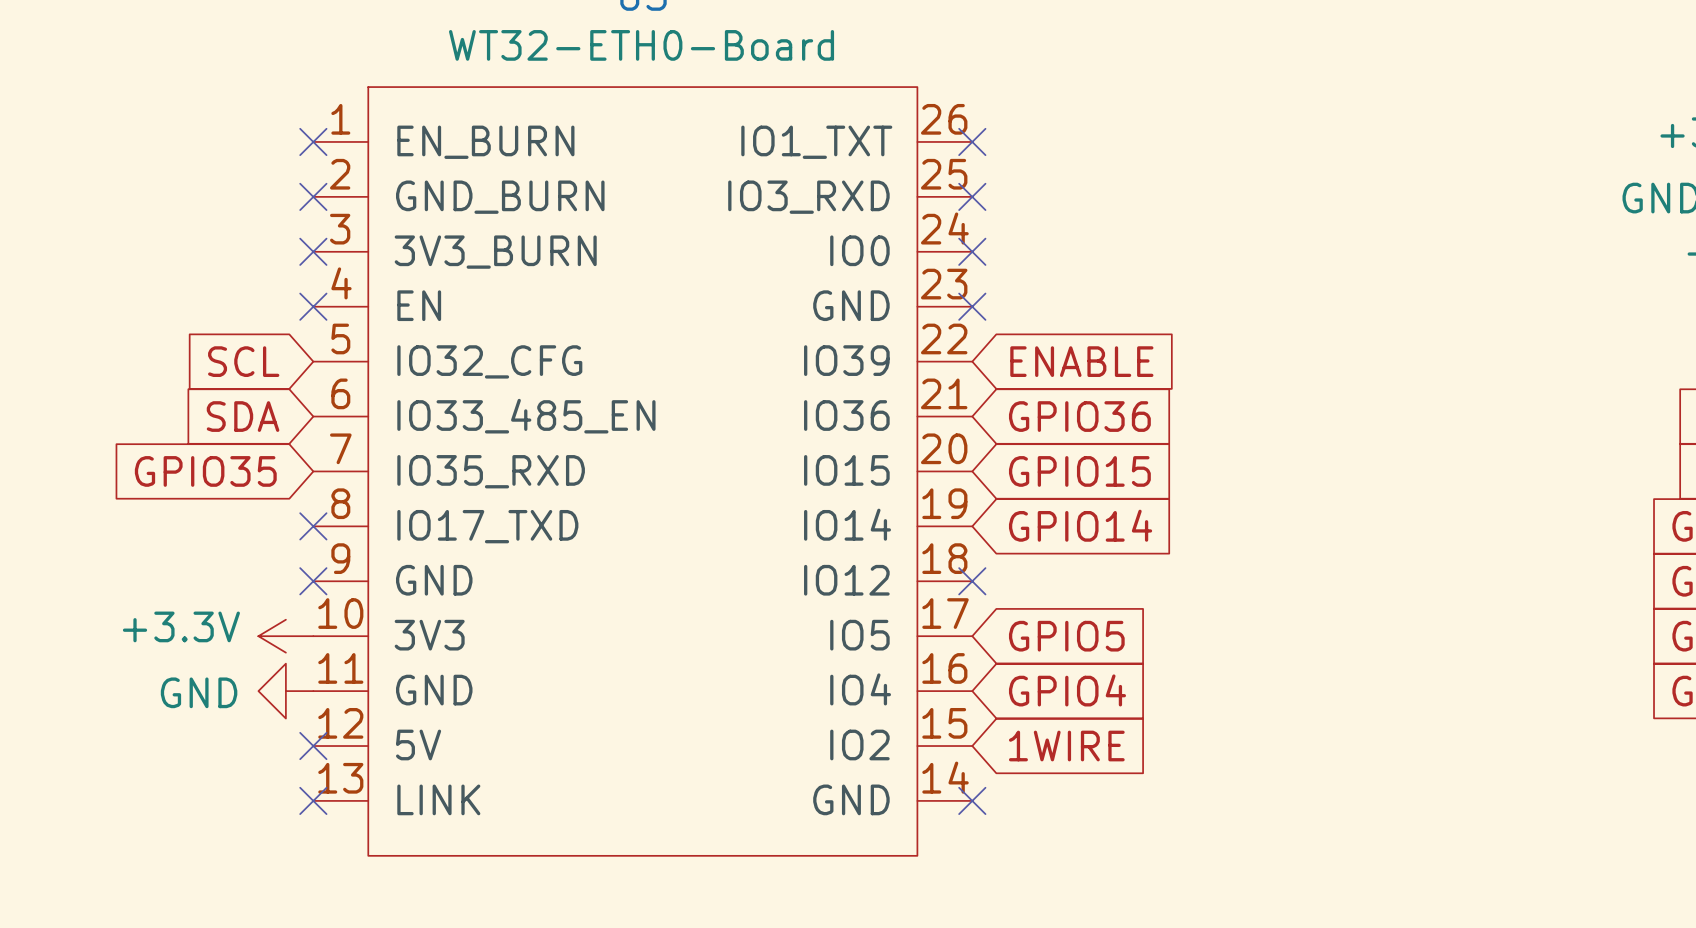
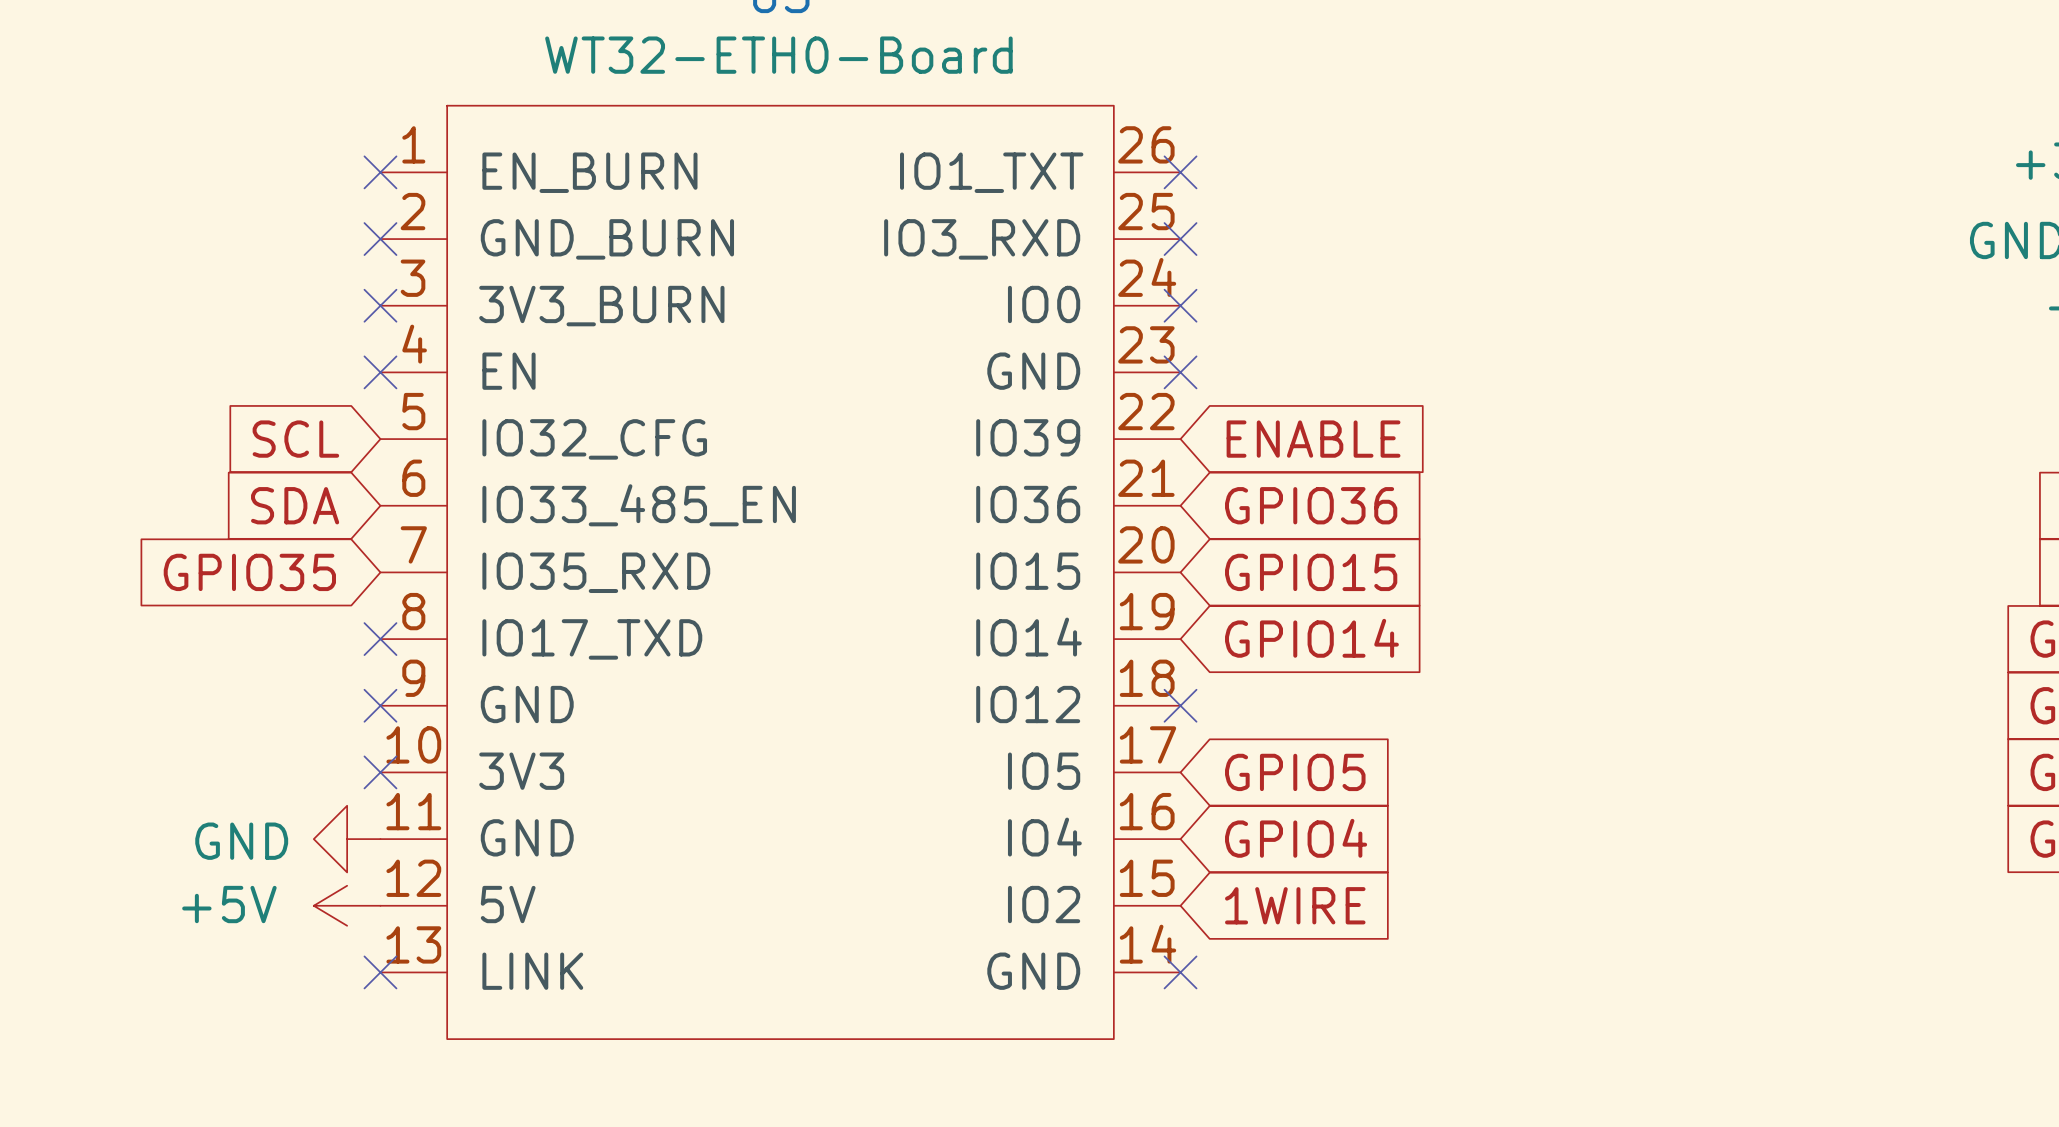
power symbol: +3.3V (285, 636) -> none
power symbol: none -> +5V (347, 905)
no-connect mark position: (313, 746) -> (380, 772)

